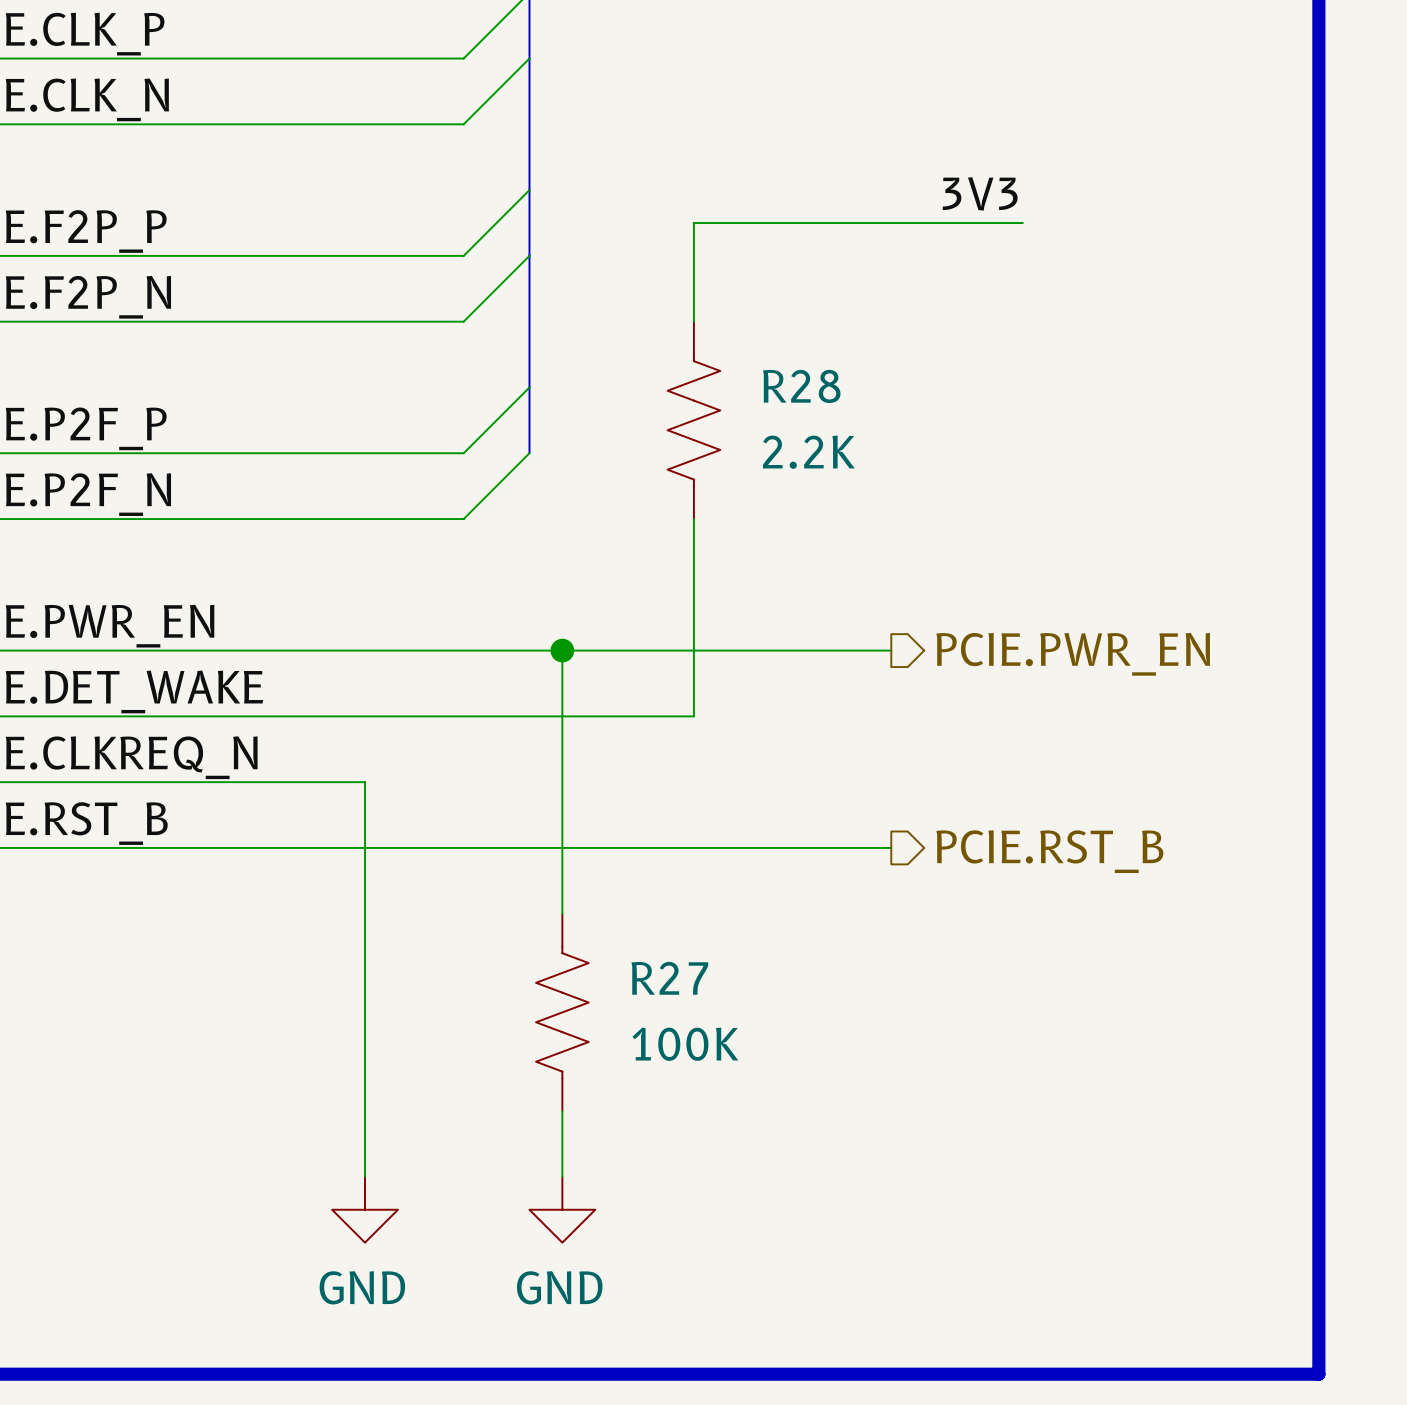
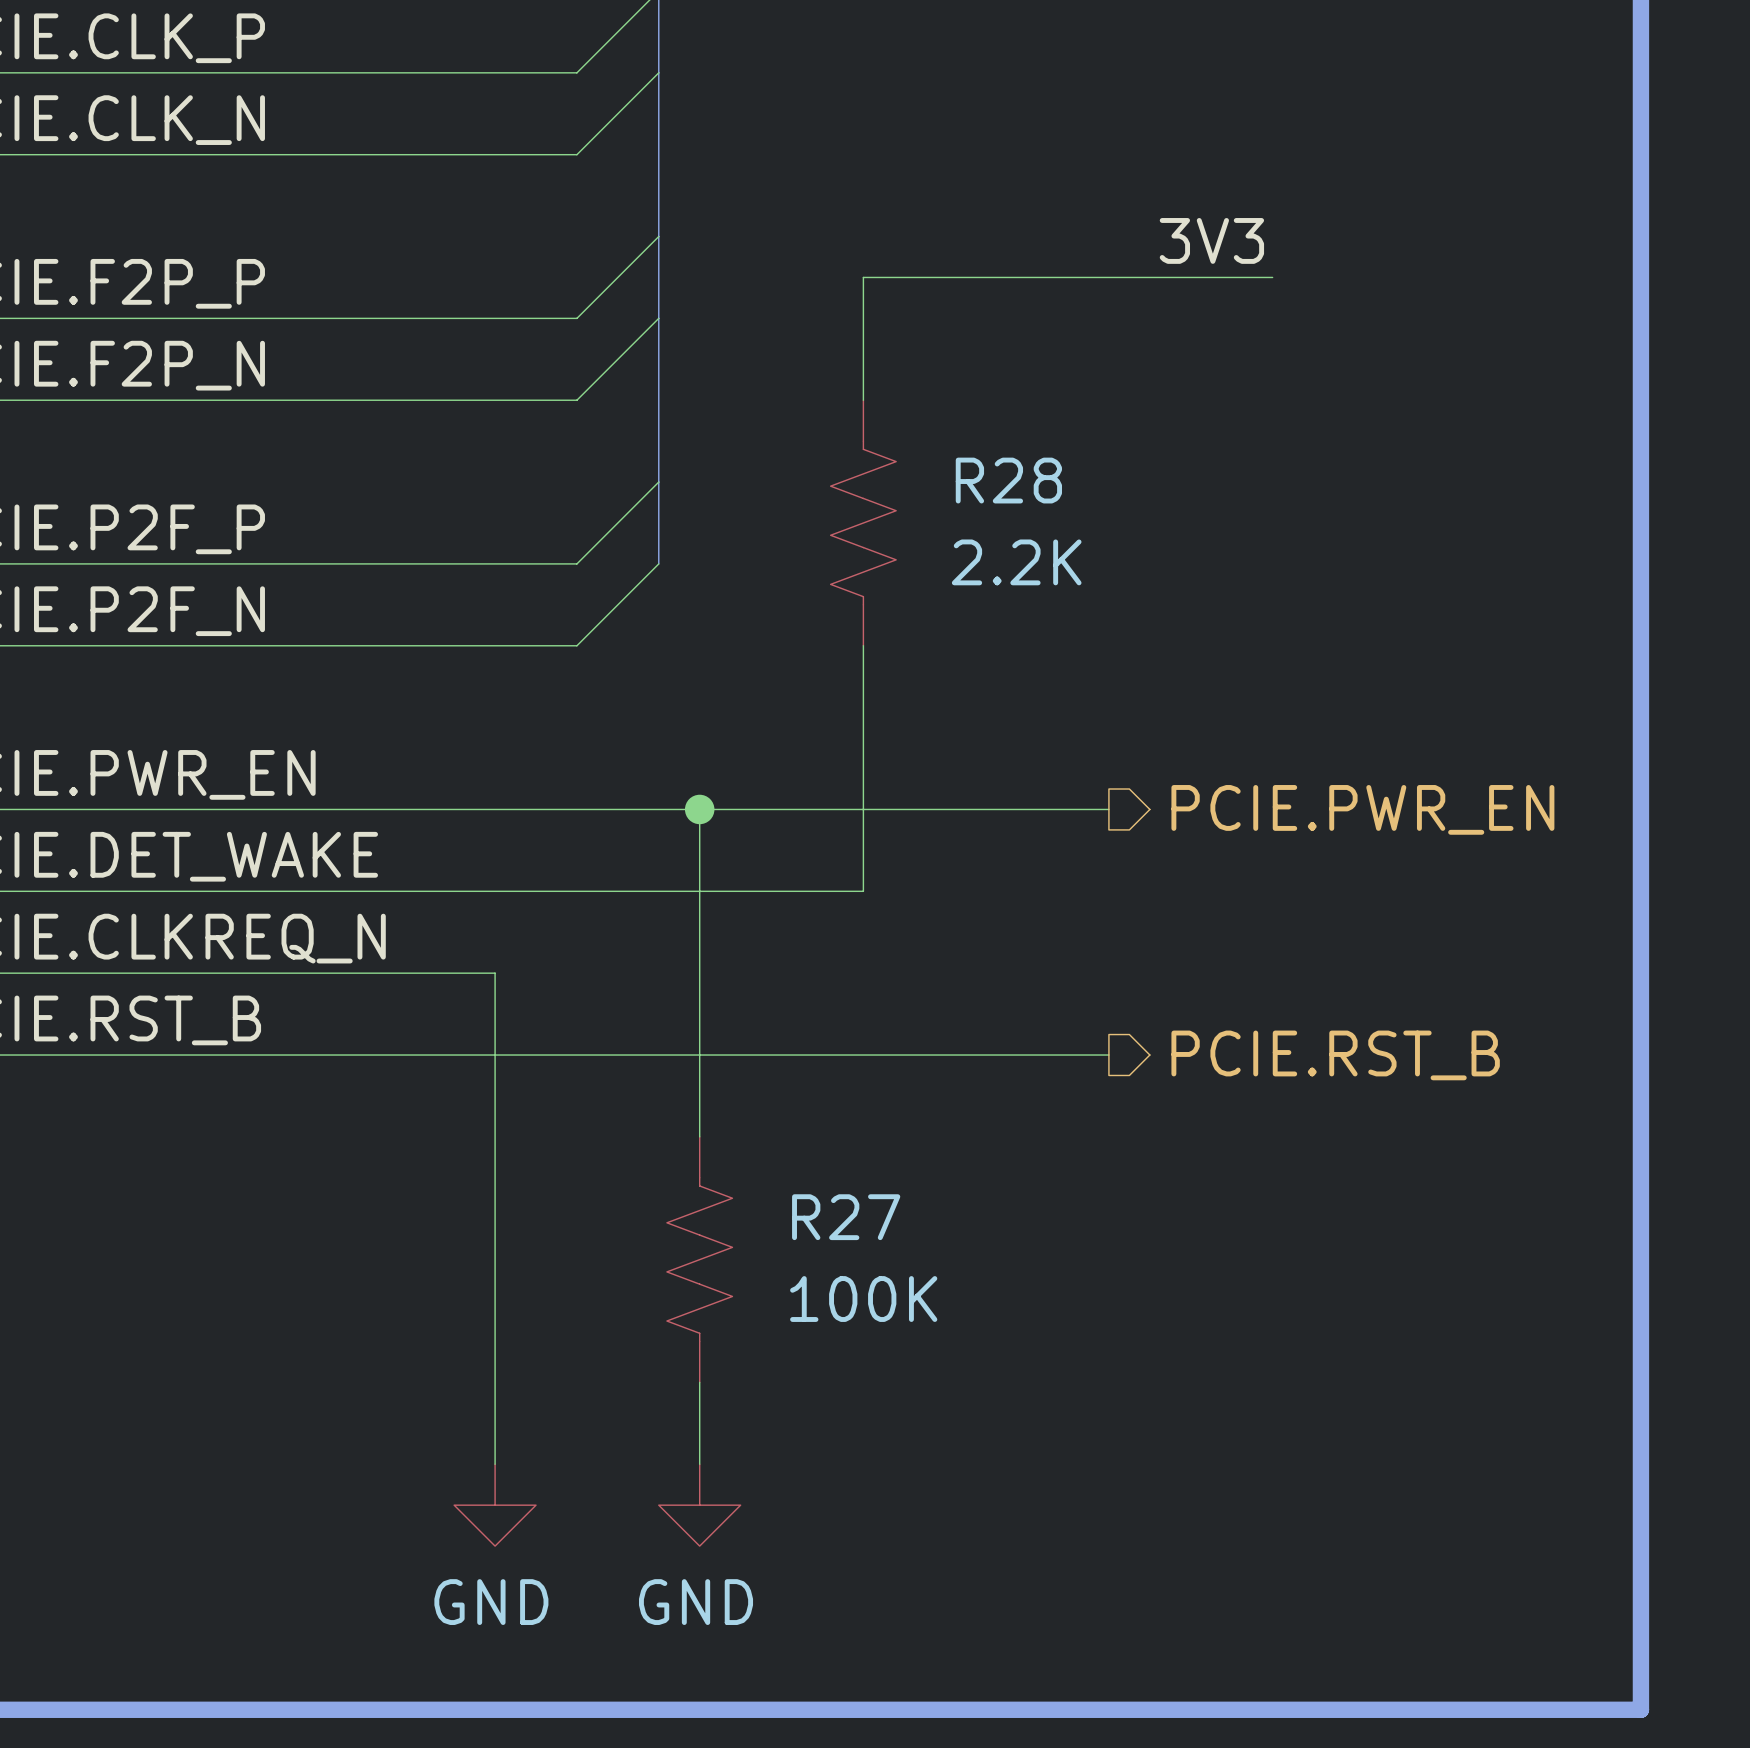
wire: (365, 782) (365, 1176) -> (454, 973) (495, 973) (495, 1464)
power symbol position: GND (365, 1209) -> GND (495, 1505)

